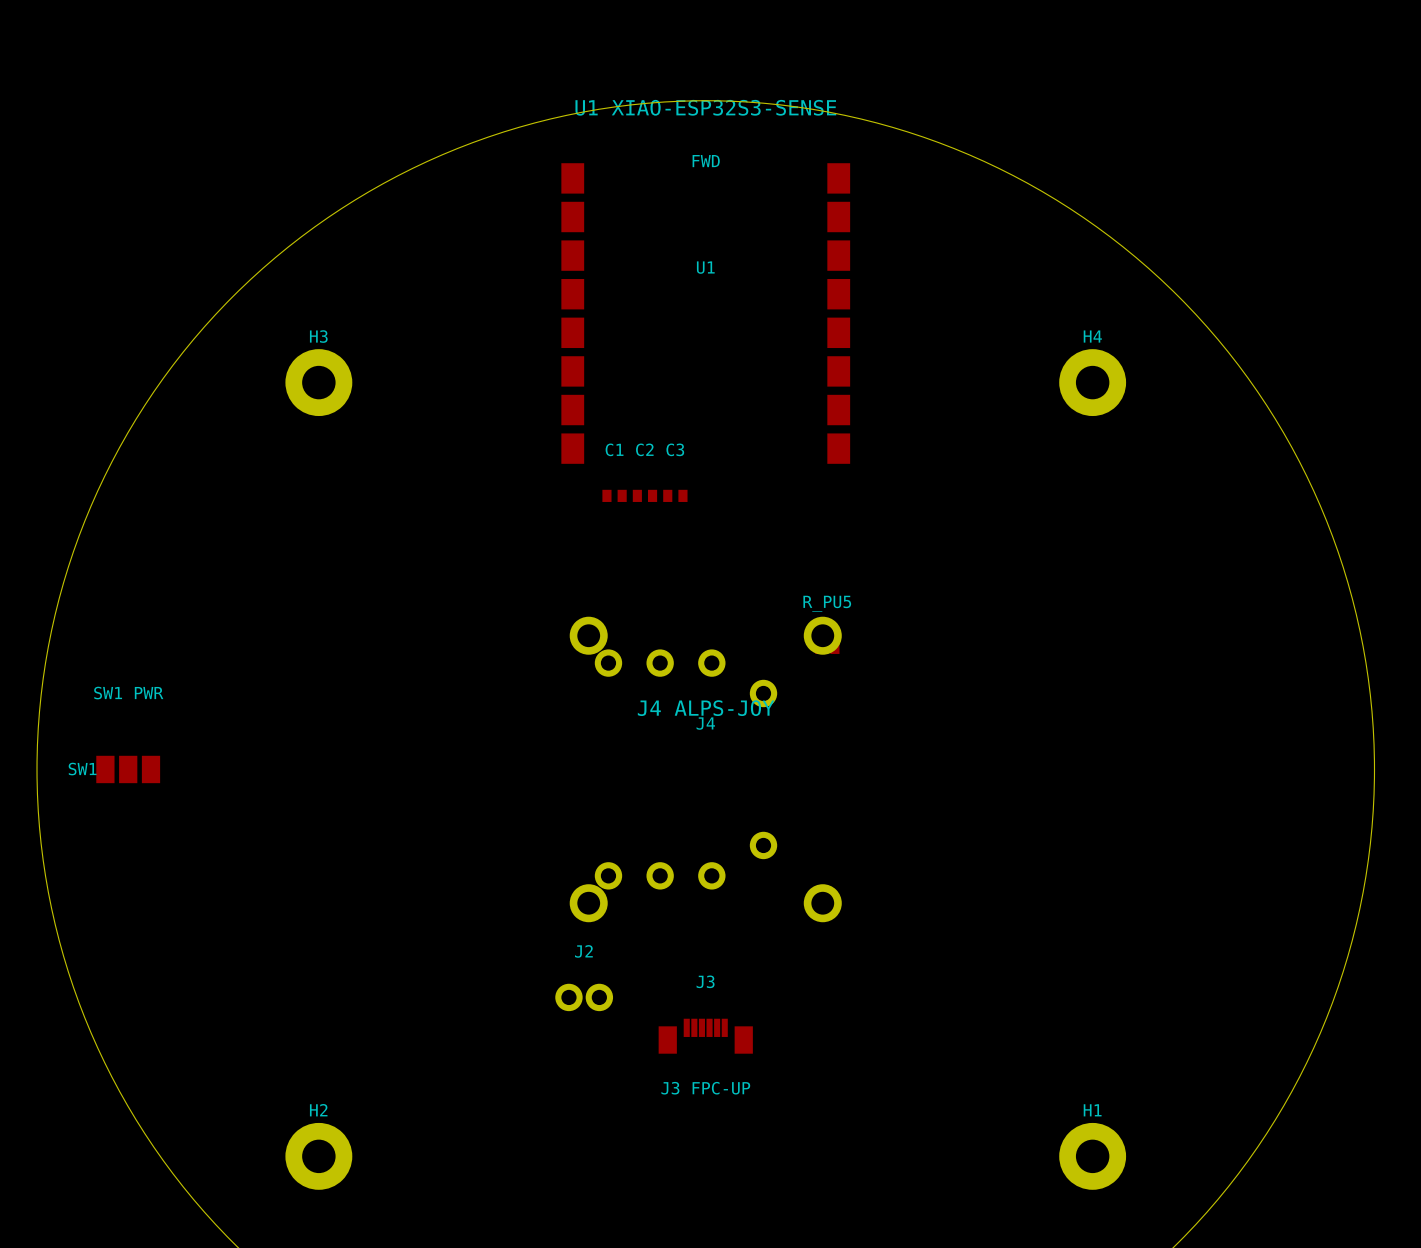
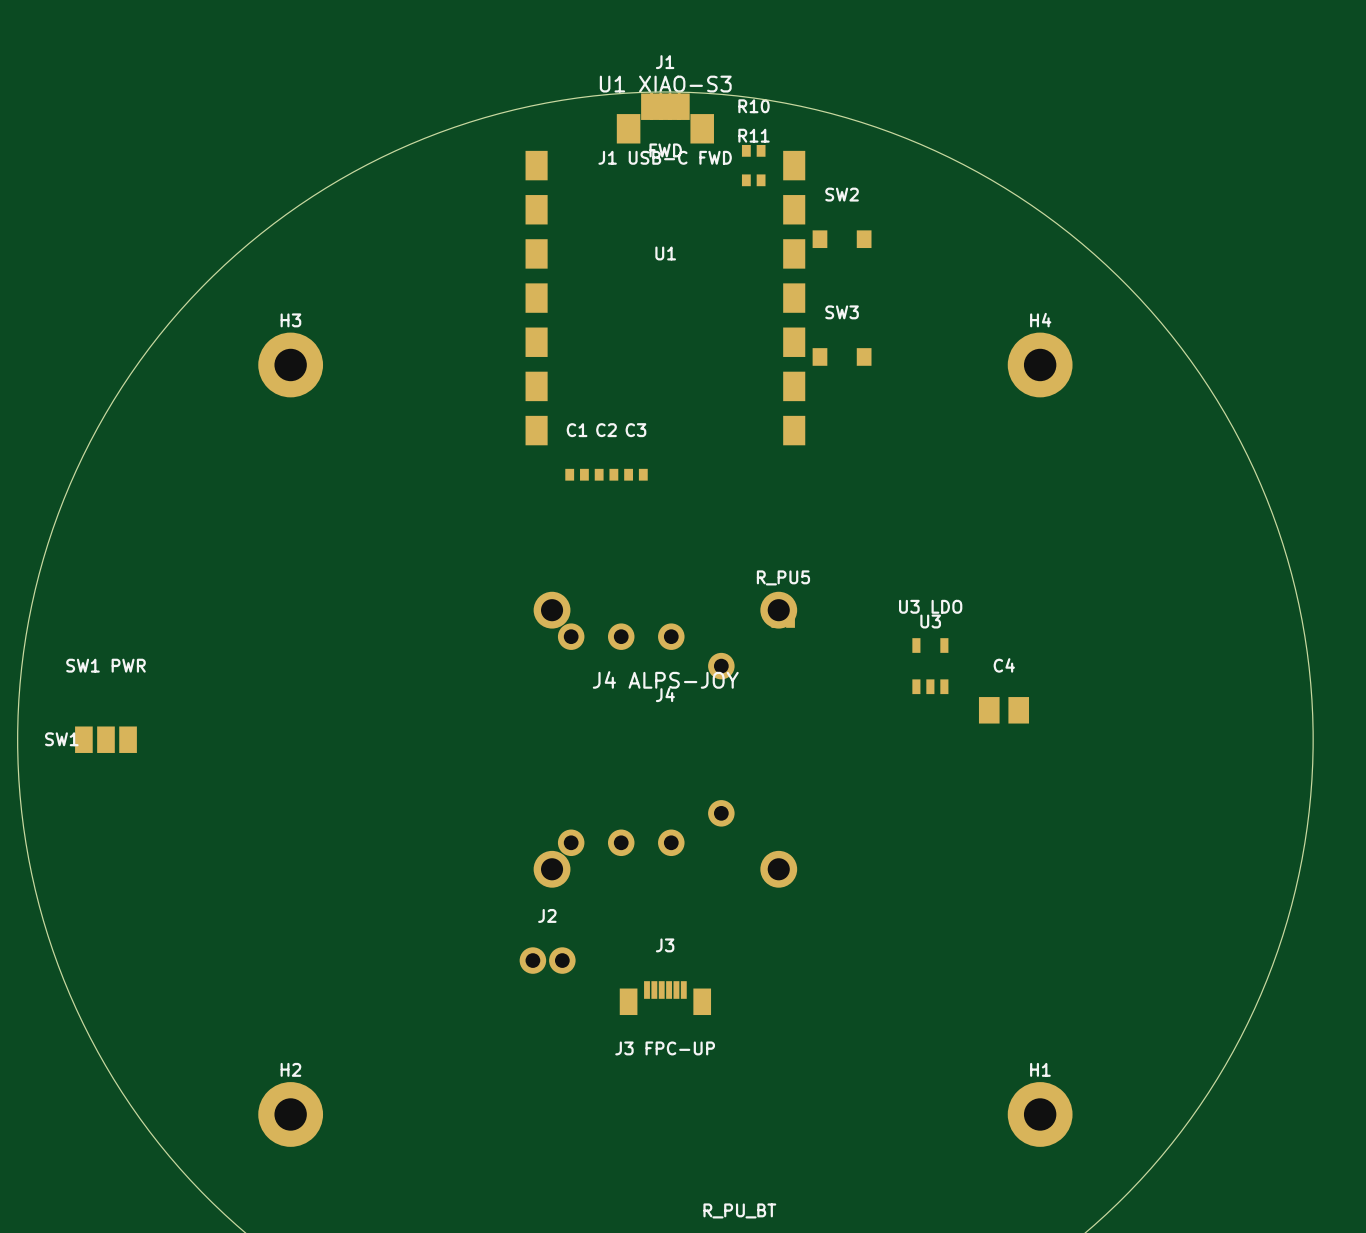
text: U1 XIAO-ESP32S3-SENSE (705, 107) -> U1 XIAO-S3 (665, 84)
J1: none -> (665, 118)
R10: none -> (753, 150)
U1 footprint: [561, 163, 851, 464] -> [525, 150, 806, 446]
text: none -> J1 USB-C FWD (665, 157)
R11: none -> (753, 180)
SW2: none -> (842, 239)
SW3: none -> (842, 356)
text: none -> U3 LDO (930, 606)
U3: none -> (930, 666)
C4: none -> (1003, 710)

